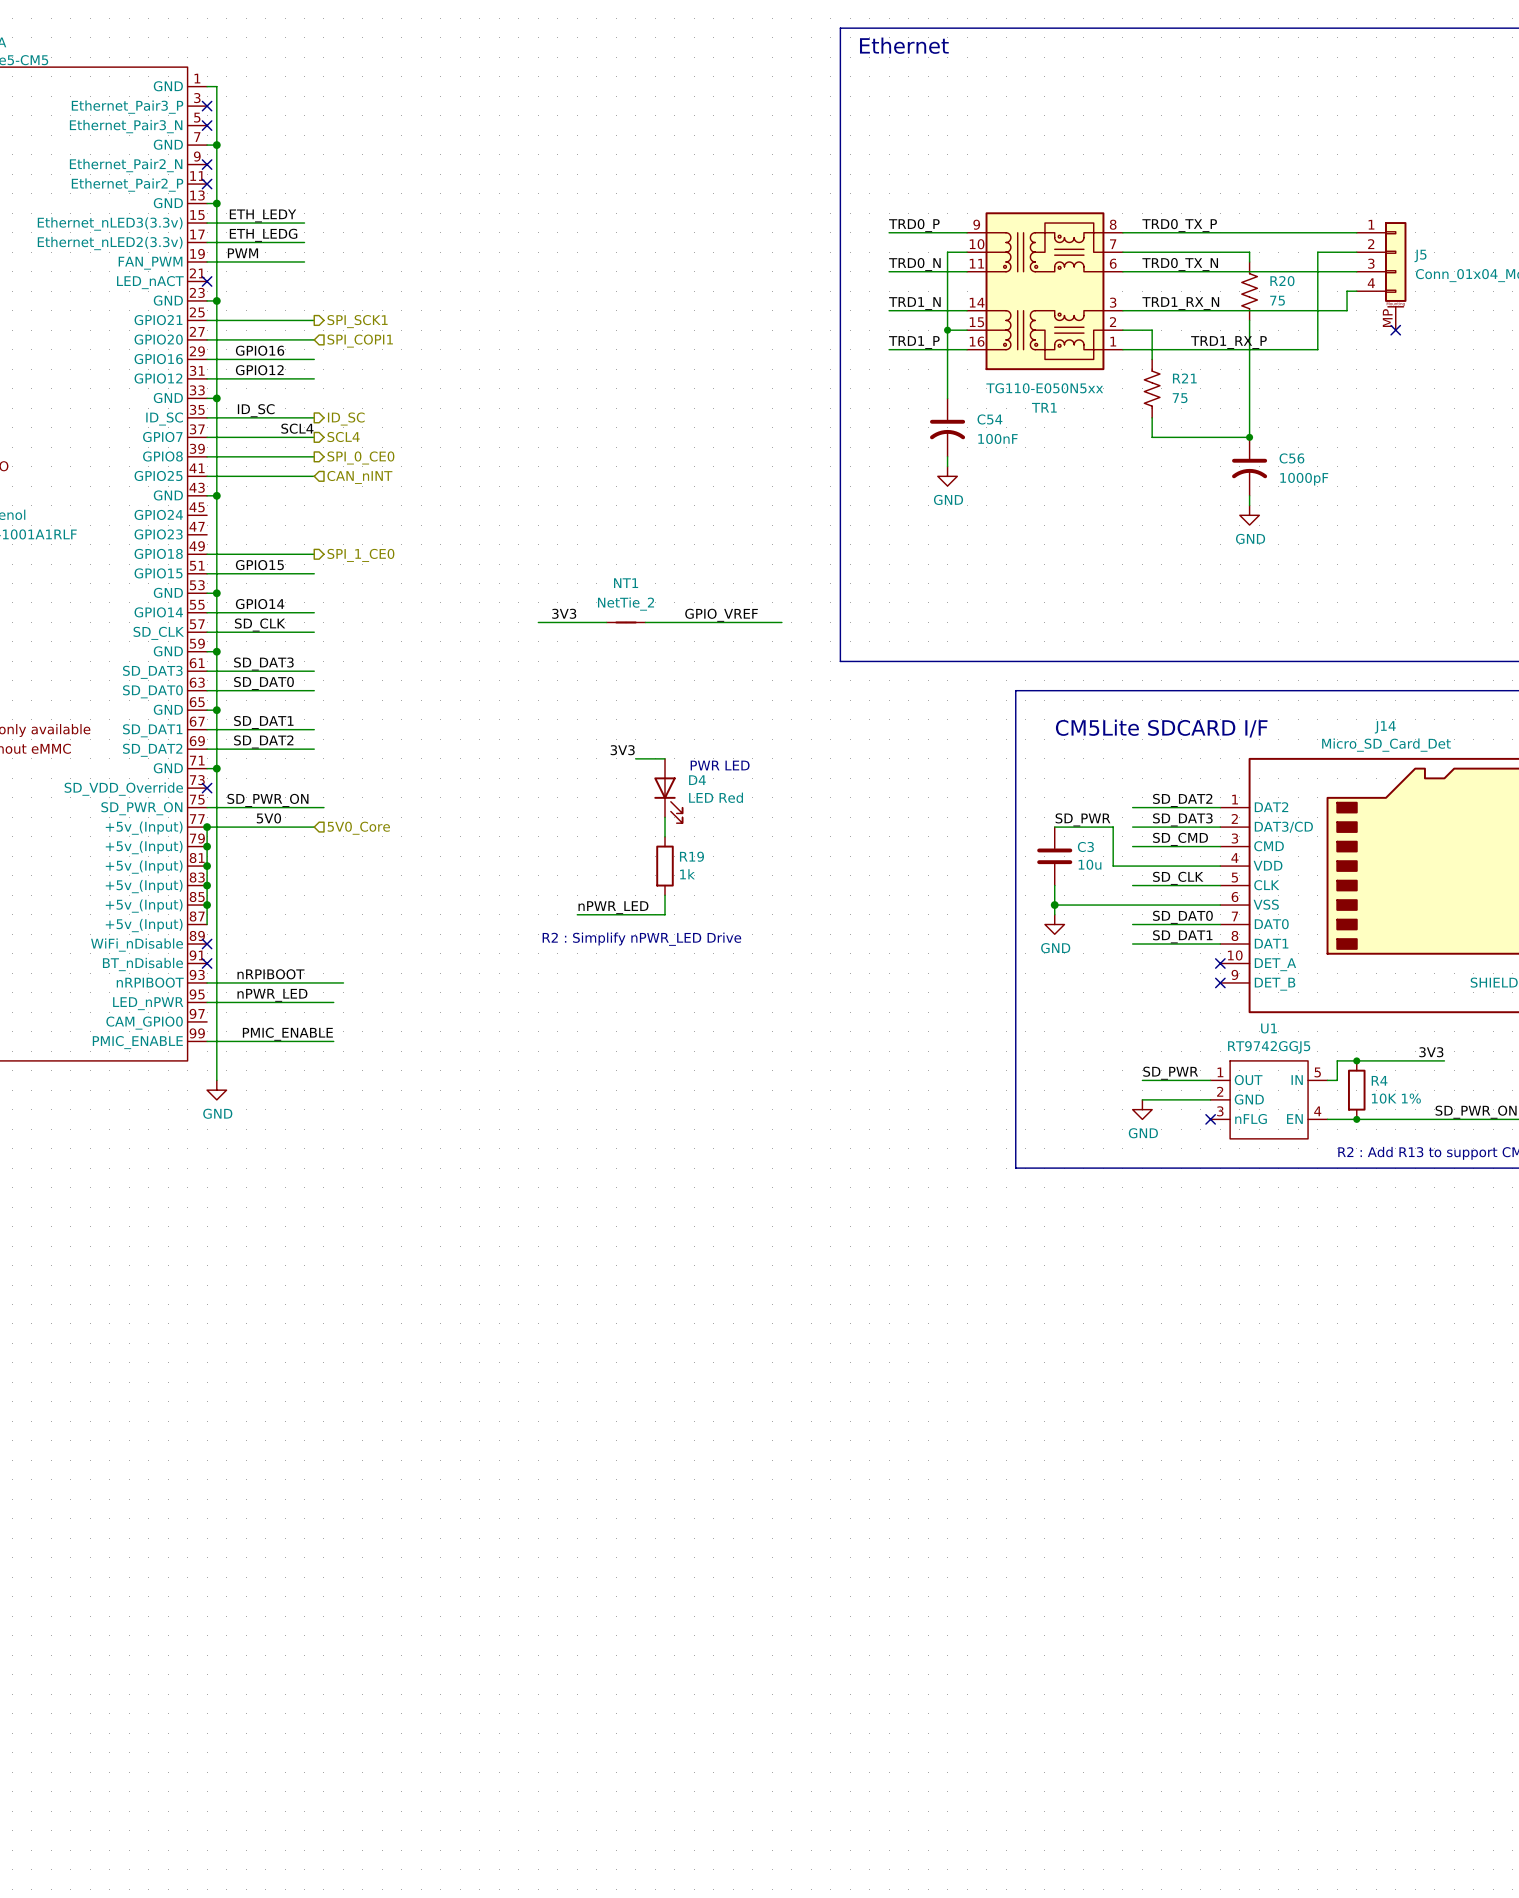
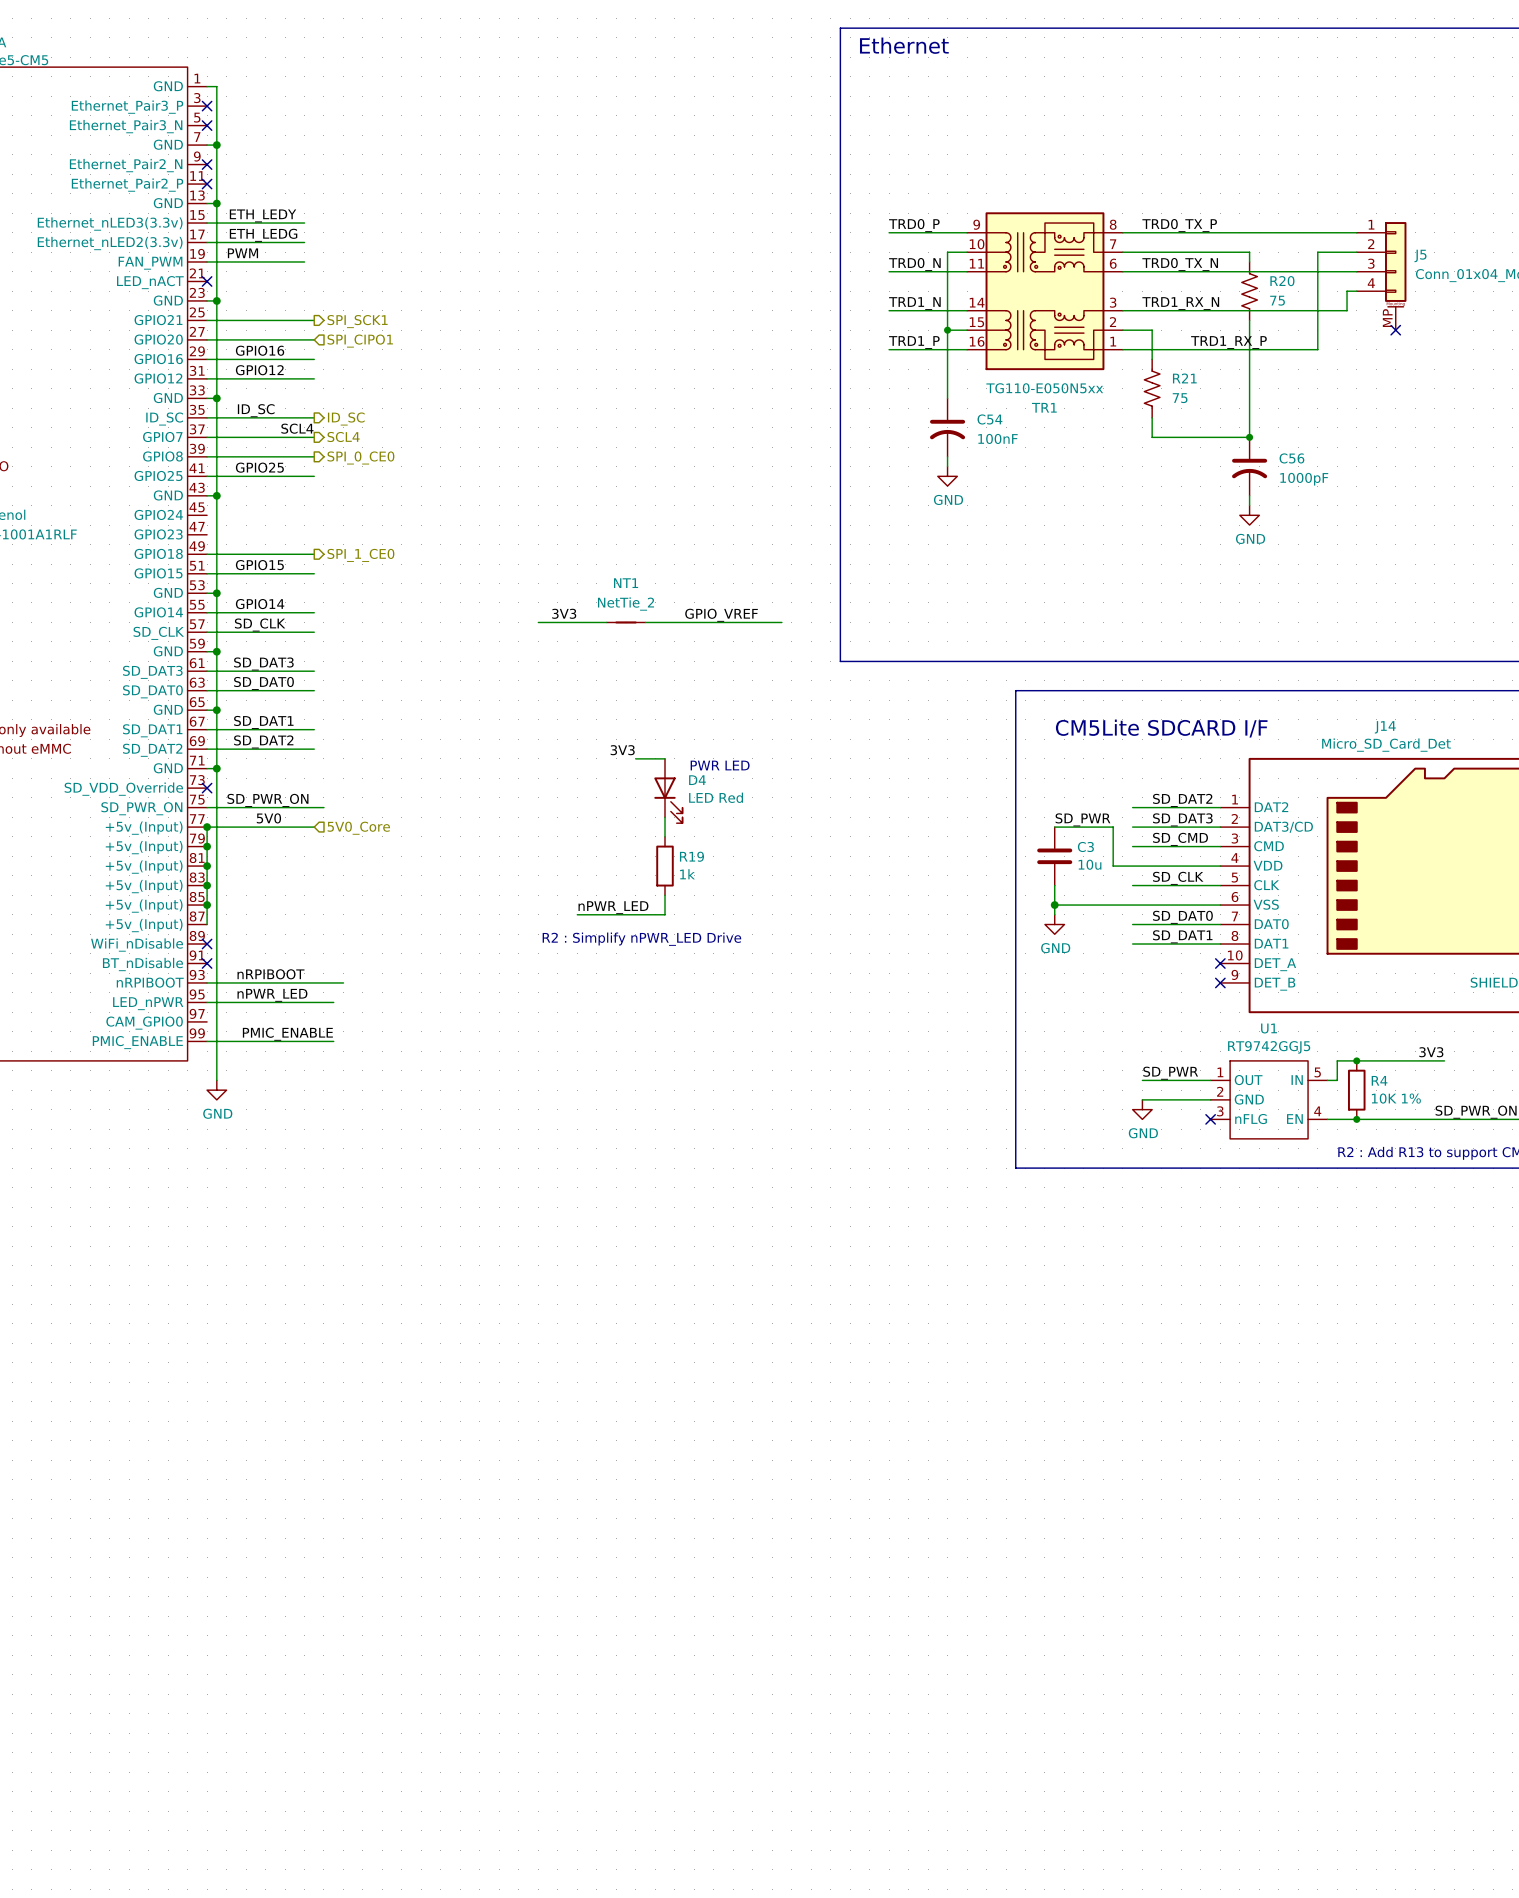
hierarchical label: SPI_COPI1 (360, 341) -> SPI_CIPO1 (360, 341)
label: none -> GPIO25 (259, 467)
hierarchical label: CAN_nINT (359, 477) -> none

